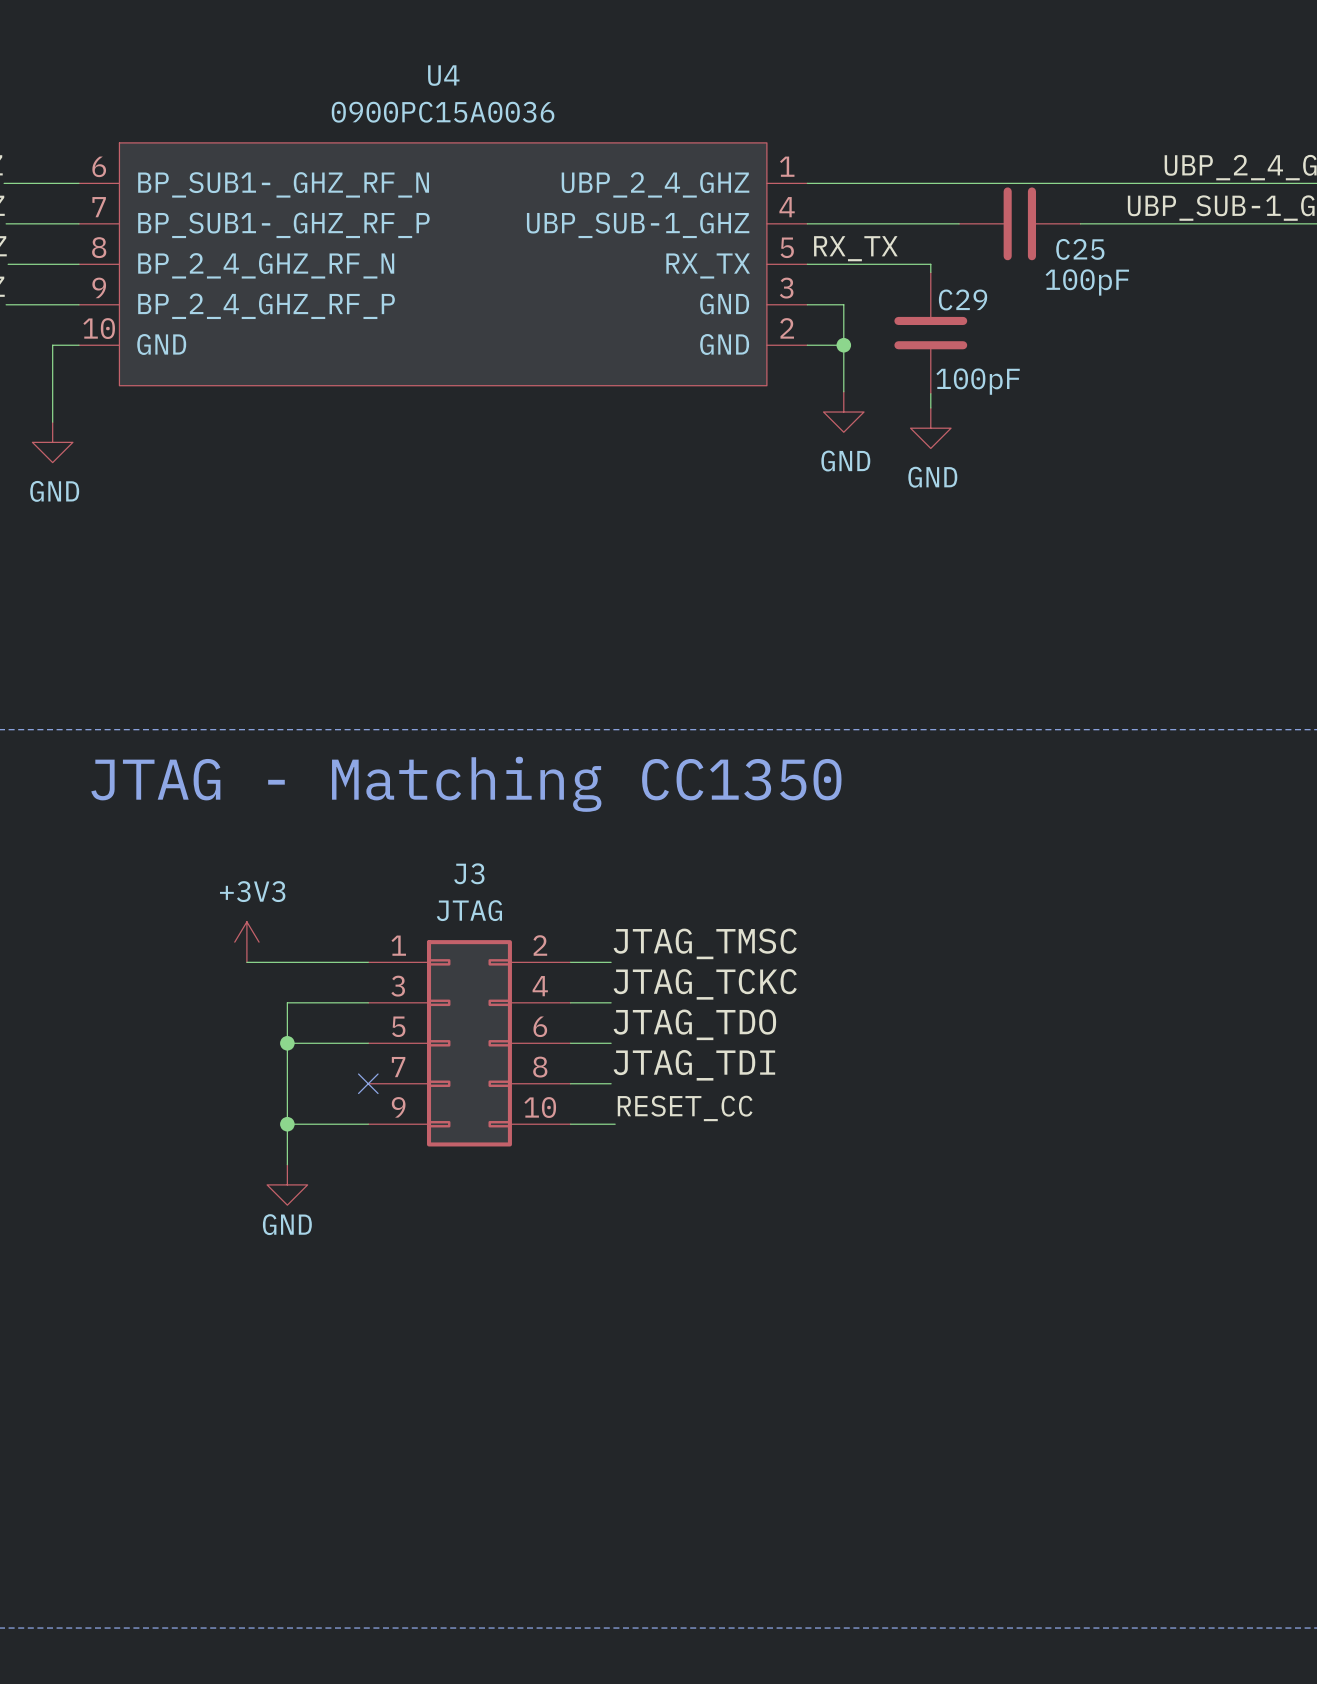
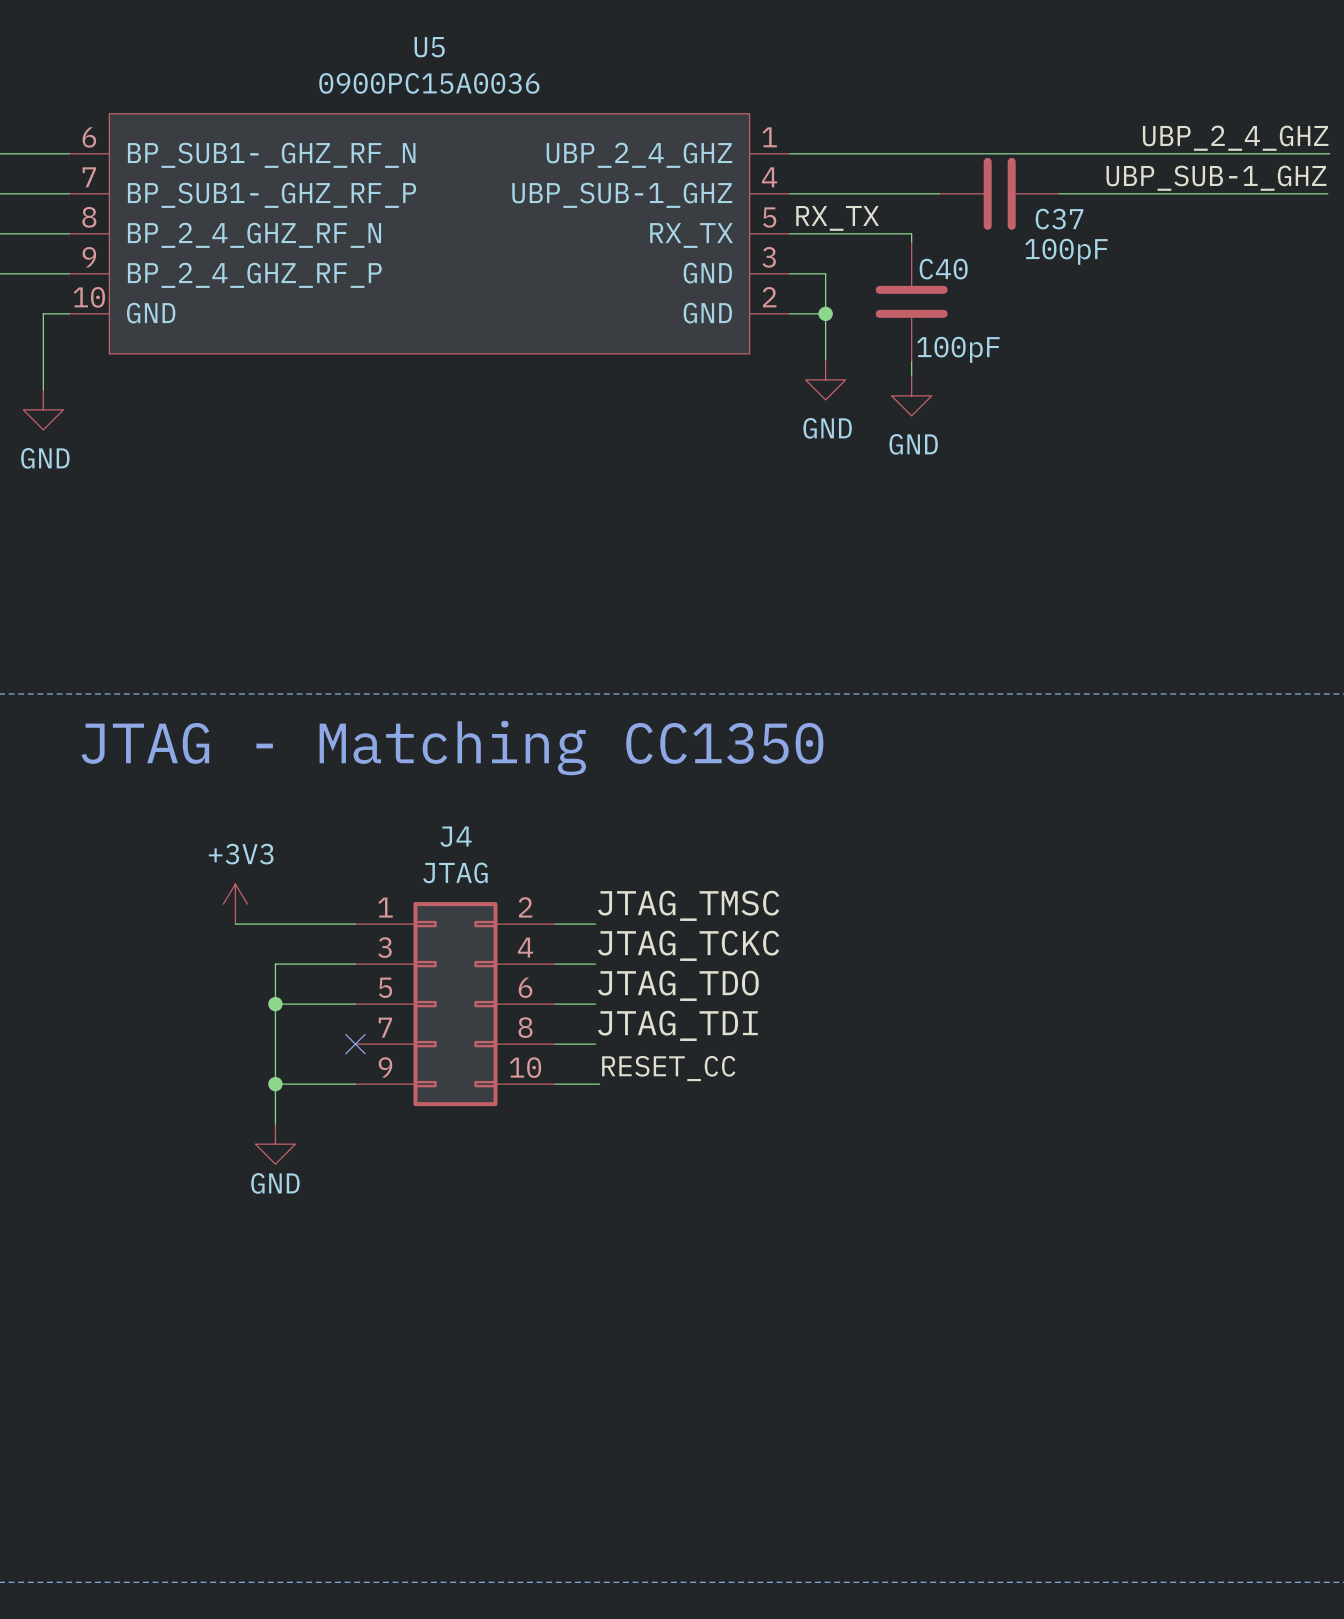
U4 name: U4 (443, 75) -> U5 (429, 47)
C25 name: C25 (1080, 249) -> C37 (1059, 219)
C29 name: C29 (963, 299) -> C40 (943, 269)
J3 name: J3 (469, 873) -> J4 (456, 836)

